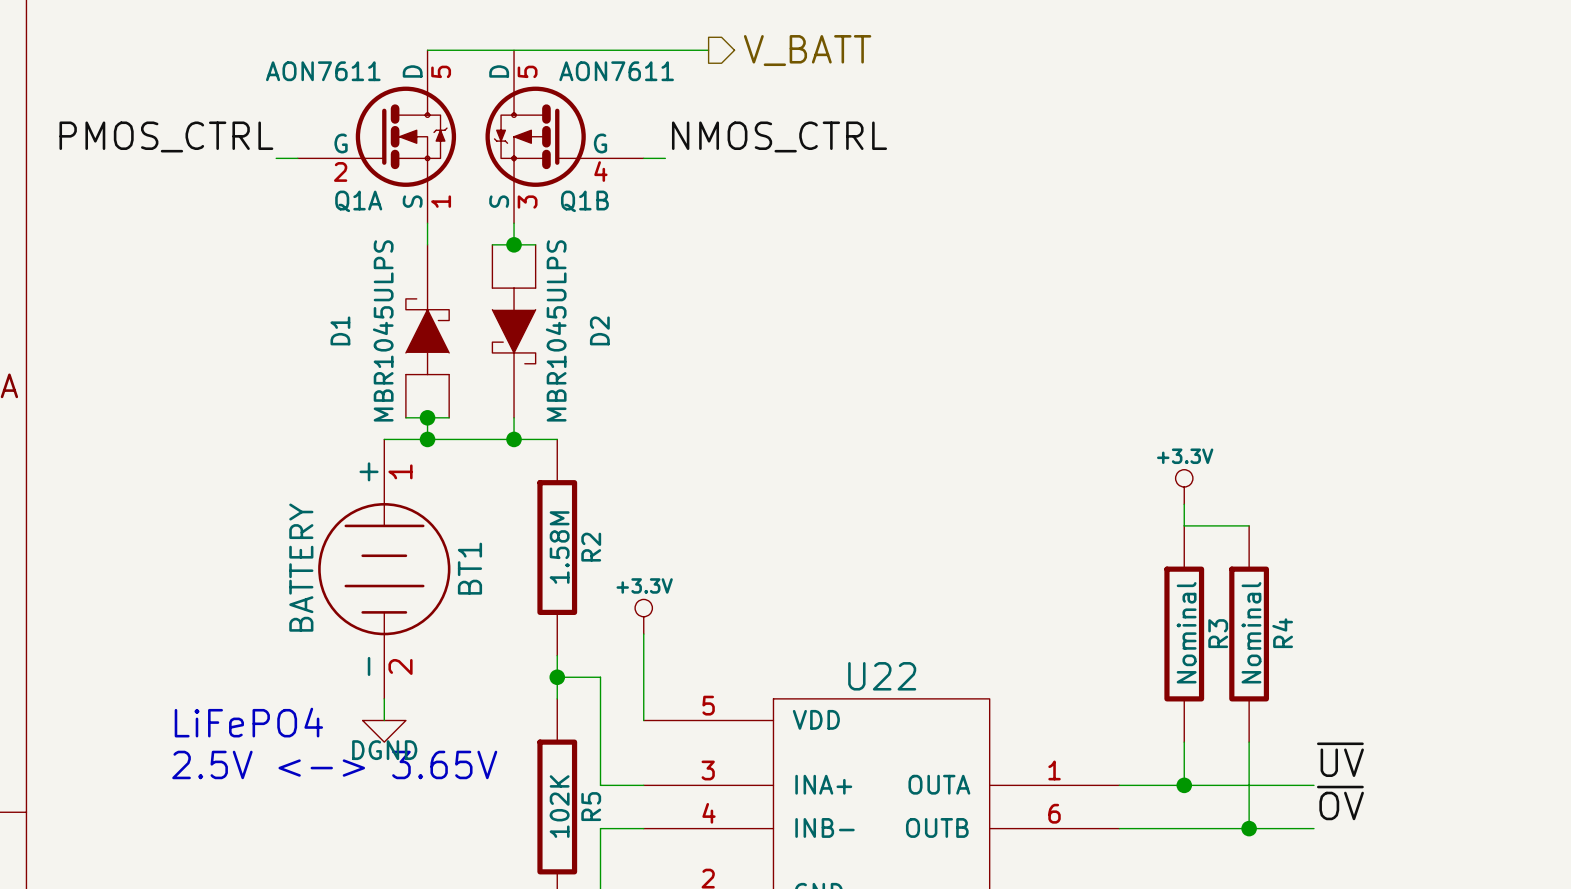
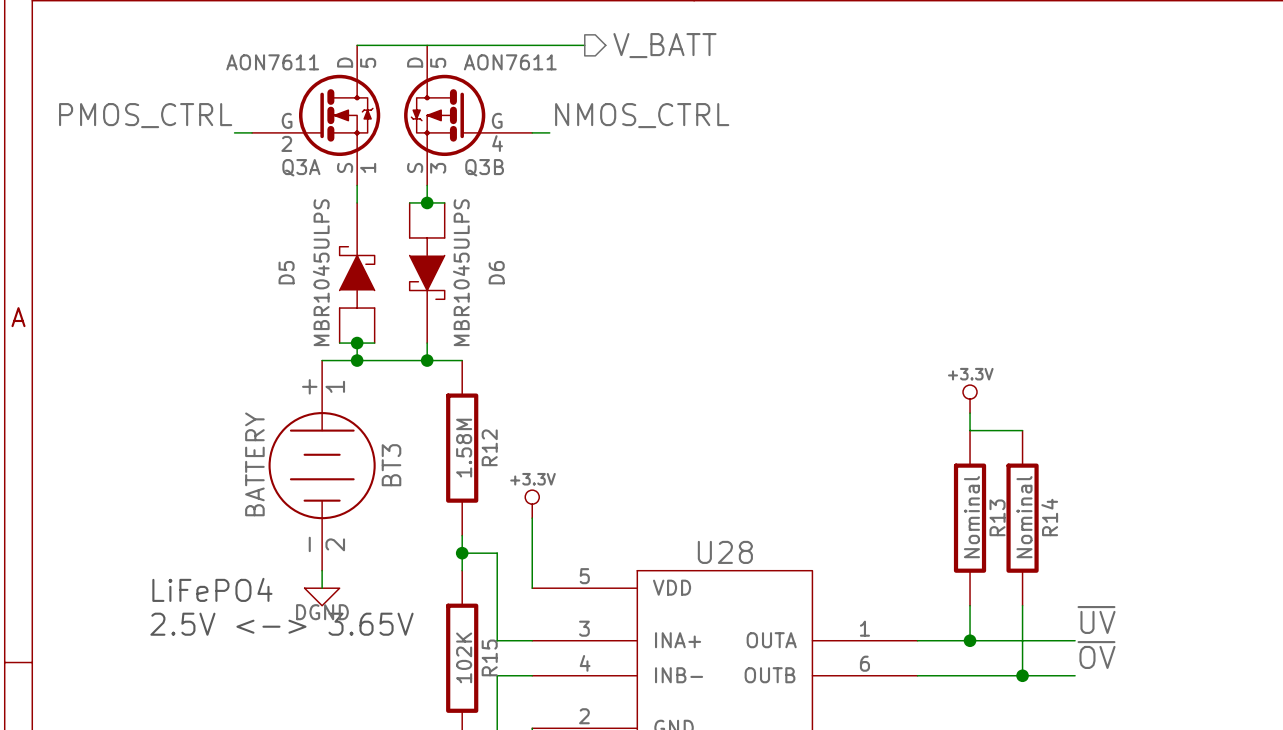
Q1A name: Q1A (358, 201) -> Q3A (301, 167)
Q1B name: Q1B (584, 201) -> Q3B (484, 167)
D1 name: D1 (340, 330) -> D5 (286, 272)
D2 name: D2 (599, 330) -> D6 (496, 272)
R2 name: R2 (591, 547) -> R12 (489, 447)
BT1 name: BT1 (469, 568) -> BT3 (391, 465)
R3 name: R3 (1218, 633) -> R13 (997, 517)
R4 name: R4 (1282, 633) -> R14 (1049, 517)
U22 name: U22 (882, 676) -> U28 (725, 552)
R5 name: R5 (591, 806) -> R15 (489, 657)

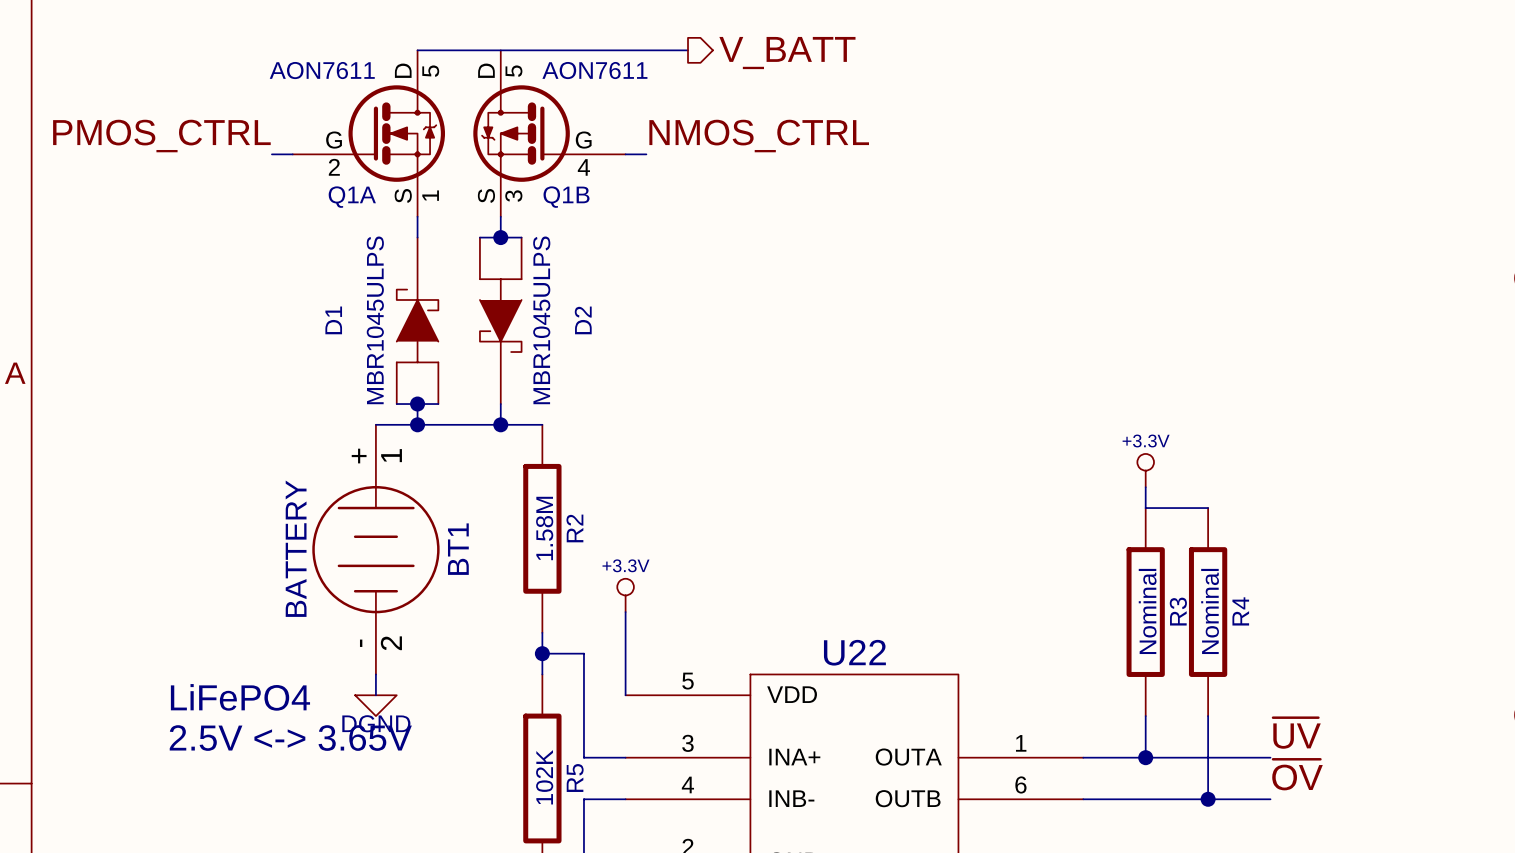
Q3A name: Q3A (301, 167) -> Q1A (352, 197)
Q3B name: Q3B (484, 167) -> Q1B (566, 197)
D5 name: D5 (286, 272) -> D1 (333, 320)
D6 name: D6 (496, 272) -> D2 (583, 320)
R12 name: R12 (489, 447) -> R2 (574, 528)
BT3 name: BT3 (391, 465) -> BT1 (458, 549)
R13 name: R13 (997, 517) -> R3 (1178, 611)
R14 name: R14 (1049, 517) -> R4 (1240, 611)
U28 name: U28 (725, 552) -> U22 (854, 652)
R15 name: R15 (489, 657) -> R5 (575, 778)

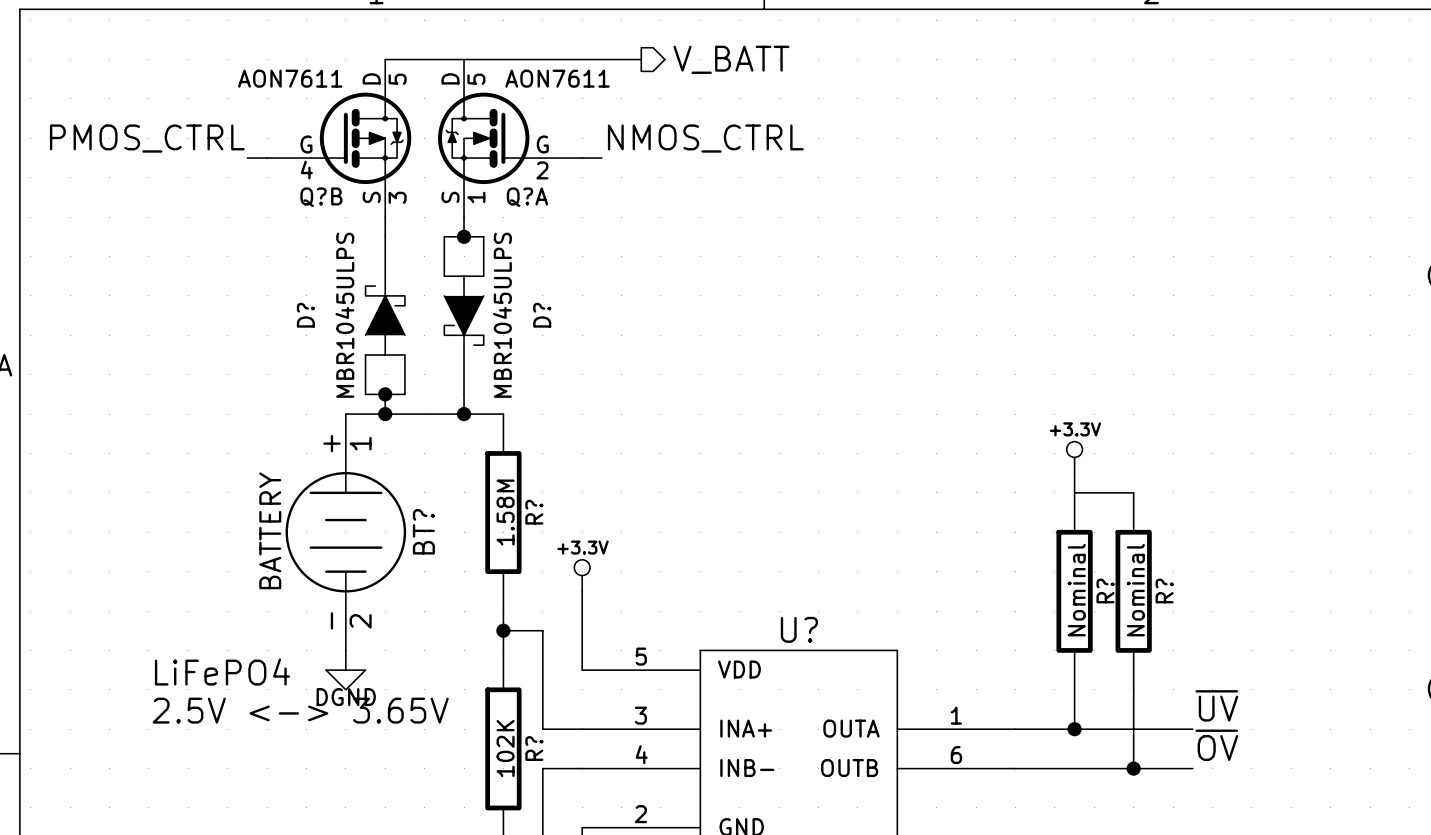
Q1A: AON7611 (368, 133) -> none
Q?B: none -> AON7611 (339, 138)
Q1B: AON7611 (549, 133) -> none
Q?A: none -> AON7611 (510, 138)
D1 name: D1 (333, 320) -> D? (305, 315)
D2 name: D2 (583, 320) -> D? (542, 315)
R2 name: R2 (574, 528) -> R? (534, 512)
BT1 name: BT1 (458, 549) -> BT? (423, 531)
R3 name: R3 (1178, 611) -> R? (1105, 590)
R4 name: R4 (1240, 611) -> R? (1164, 590)
U22 name: U22 (854, 652) -> U? (799, 629)
R5 name: R5 (575, 778) -> R? (534, 748)

